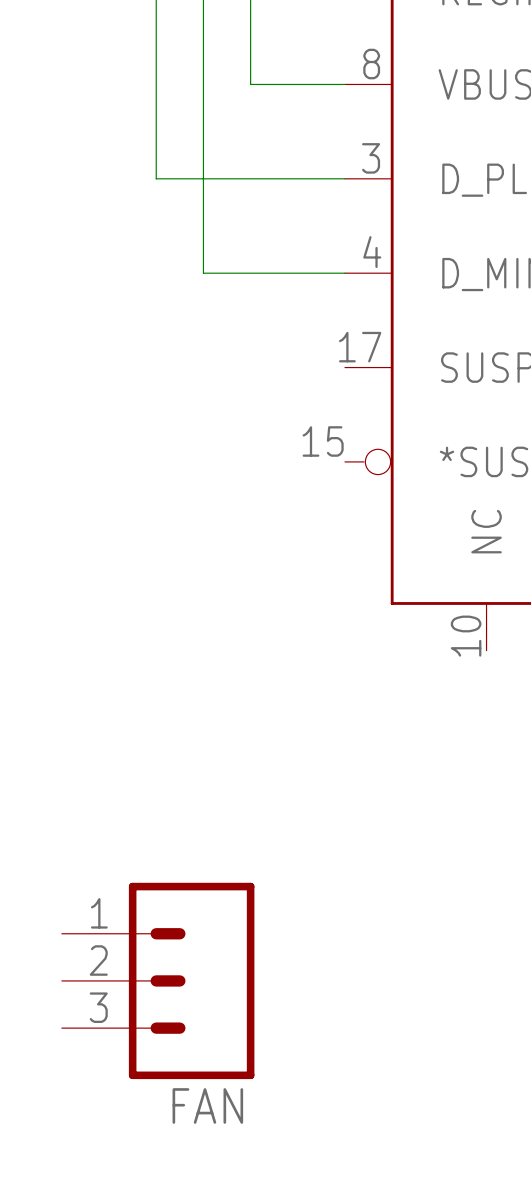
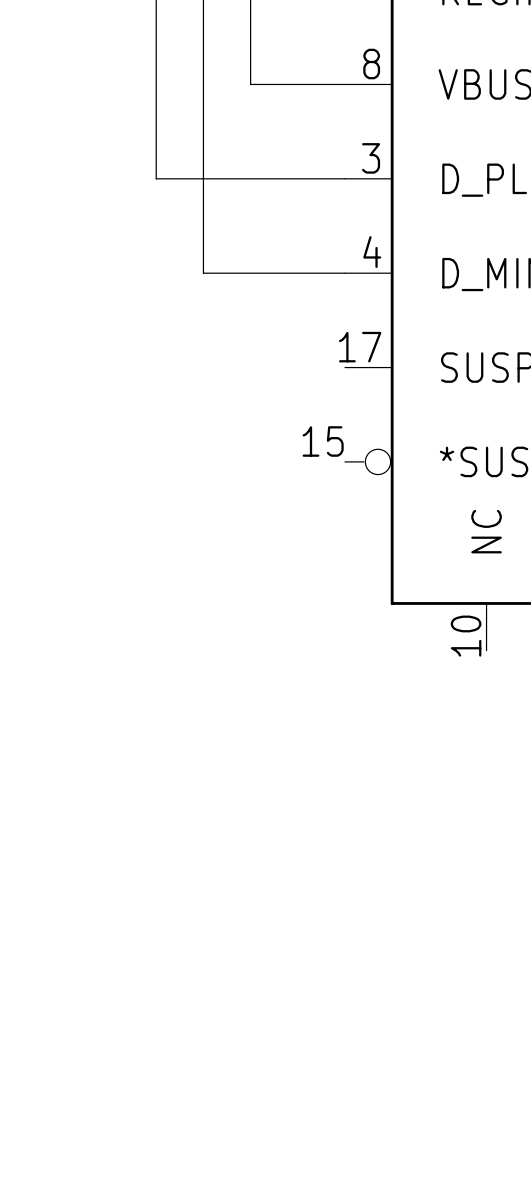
FAN: (158, 980) -> none

